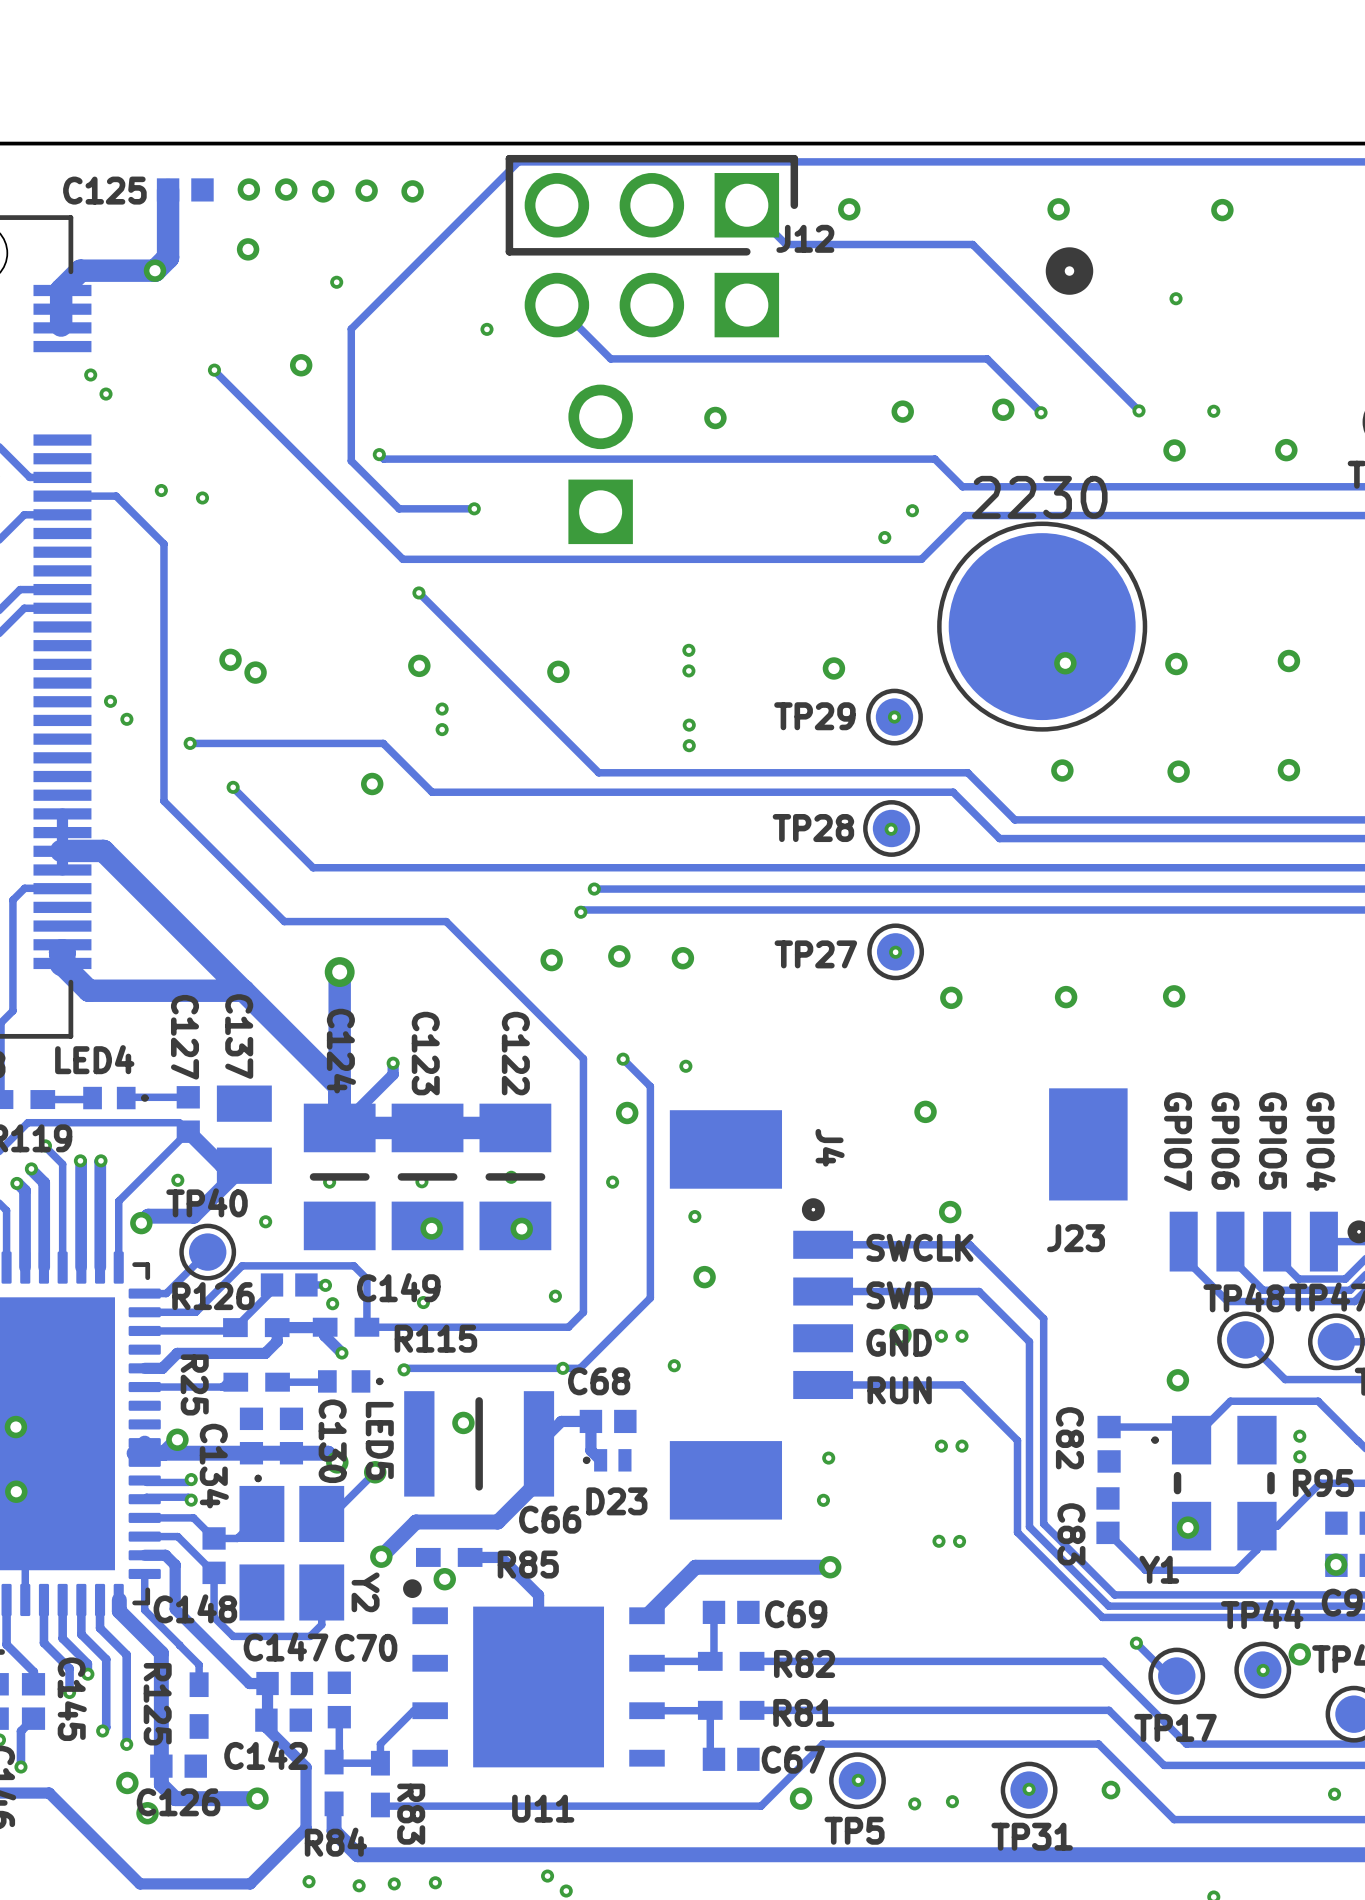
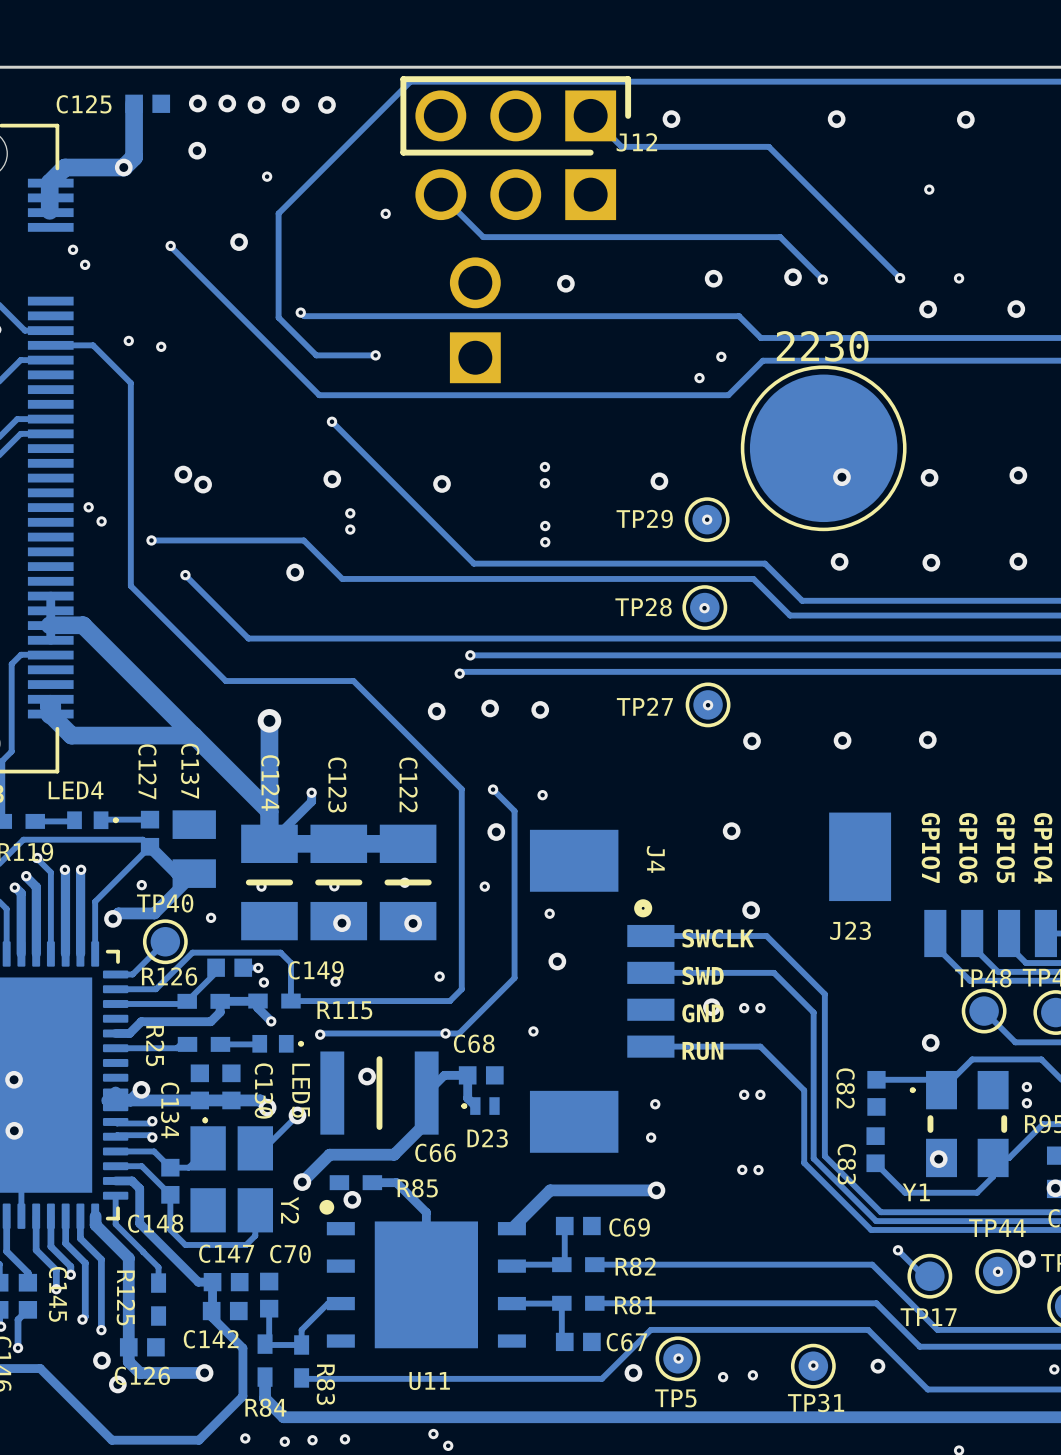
part: (1069, 271) -> none

